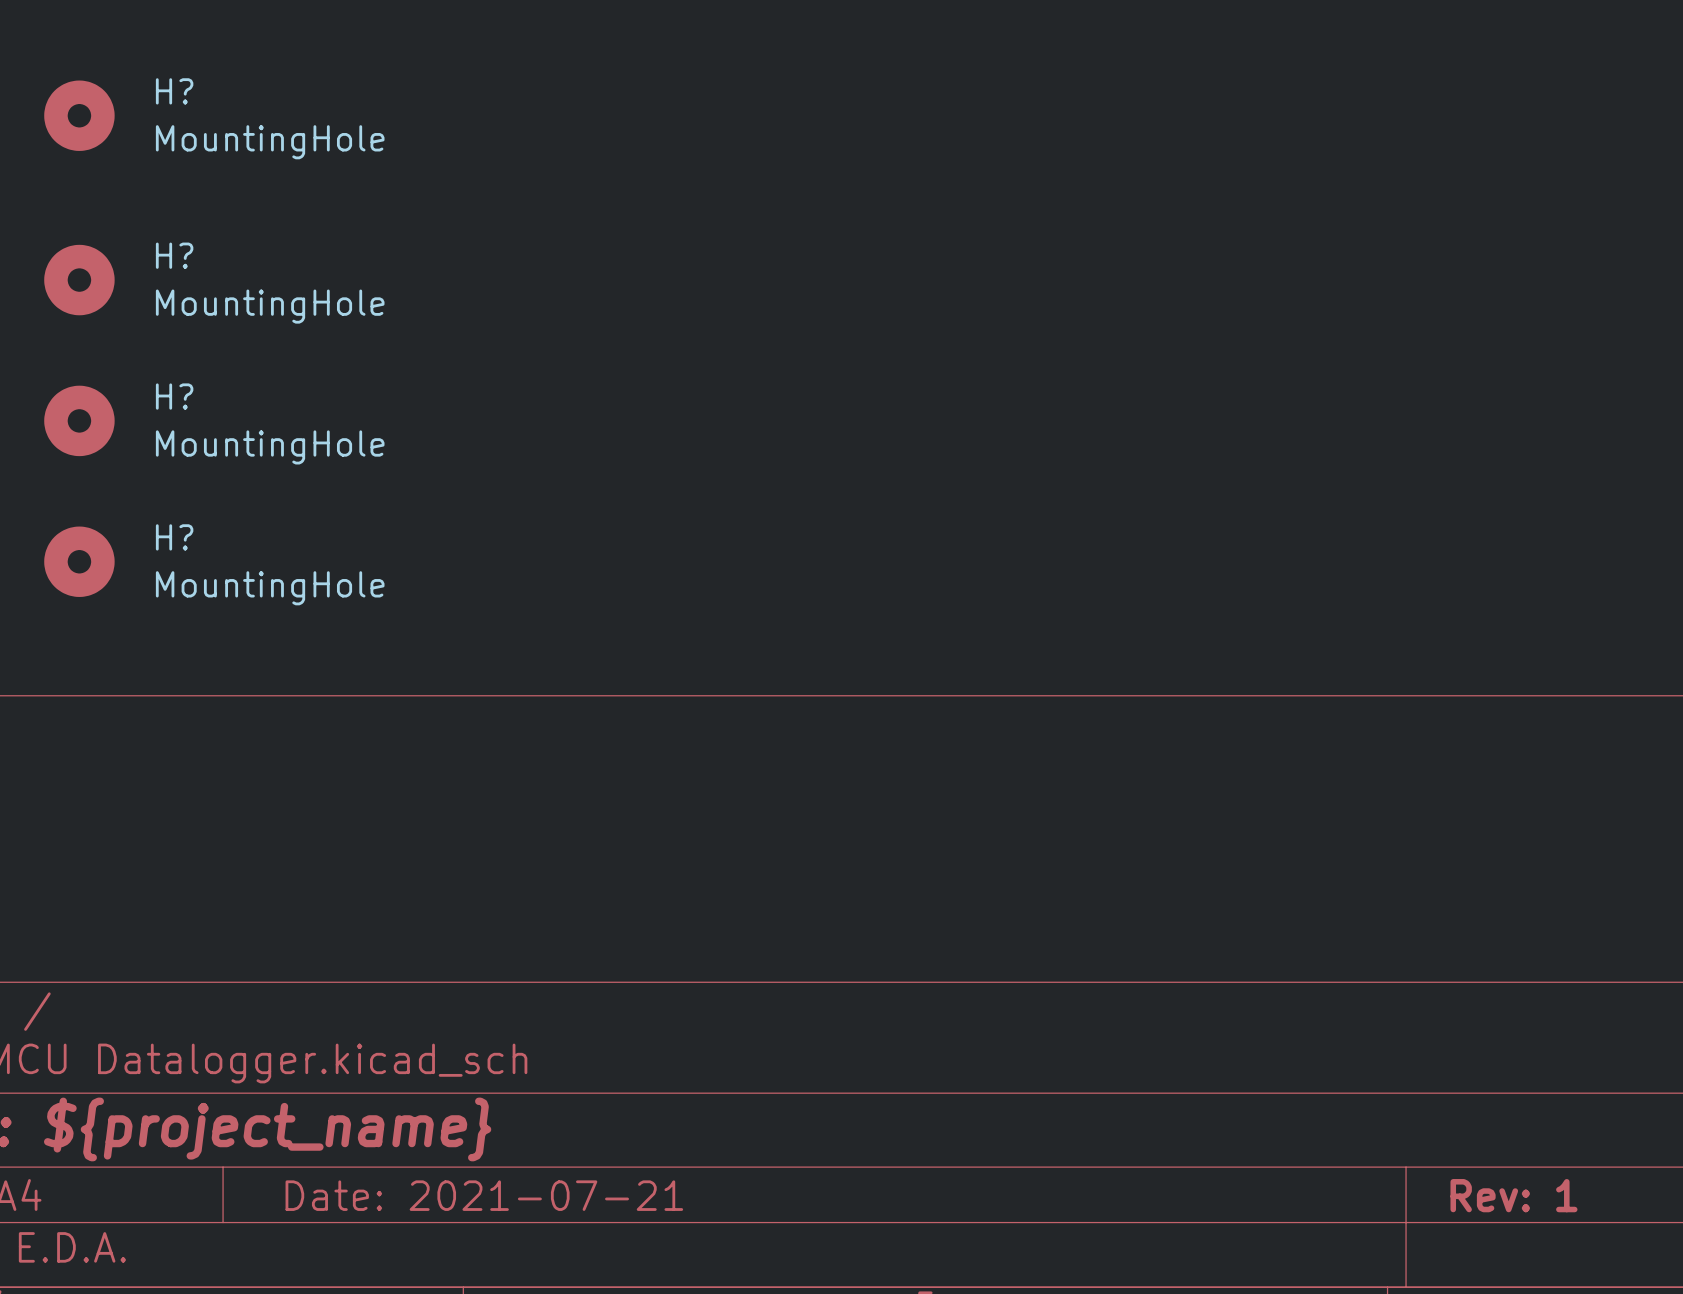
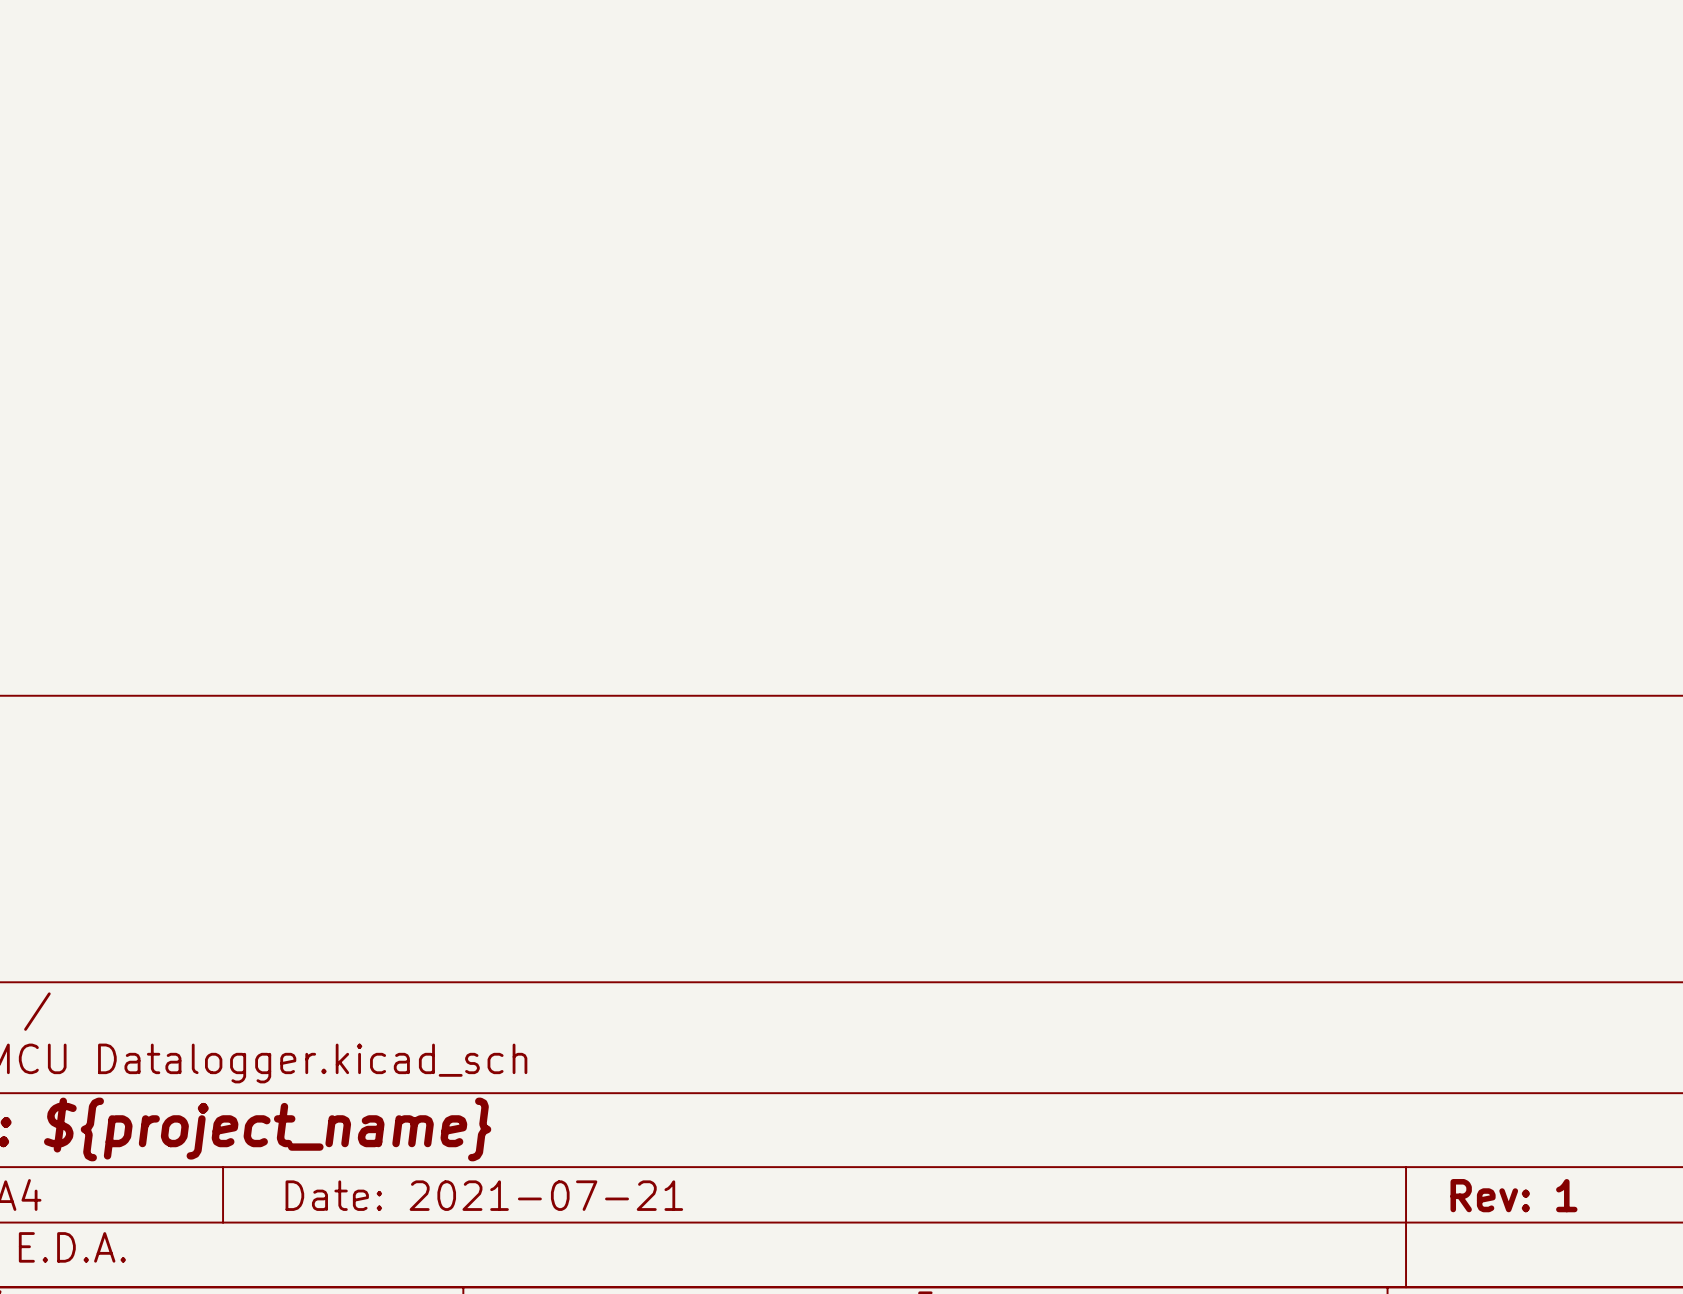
H?: MountingHole (79, 115) -> none
H?: MountingHole (79, 280) -> none
H?: MountingHole (79, 420) -> none
H?: MountingHole (79, 561) -> none

